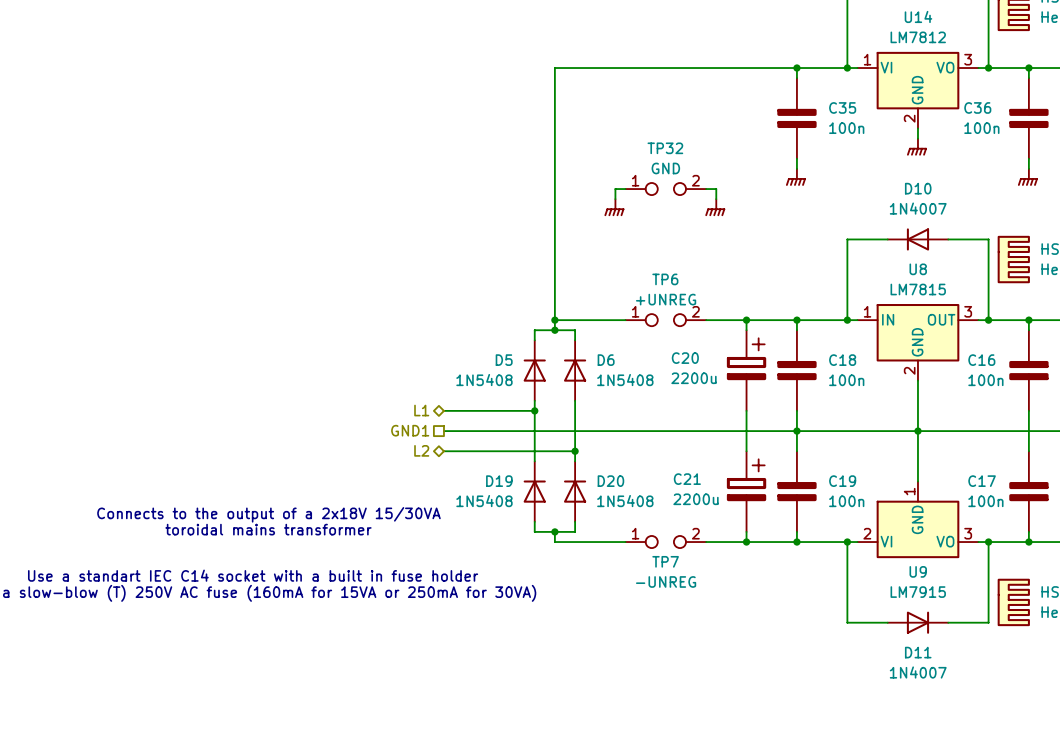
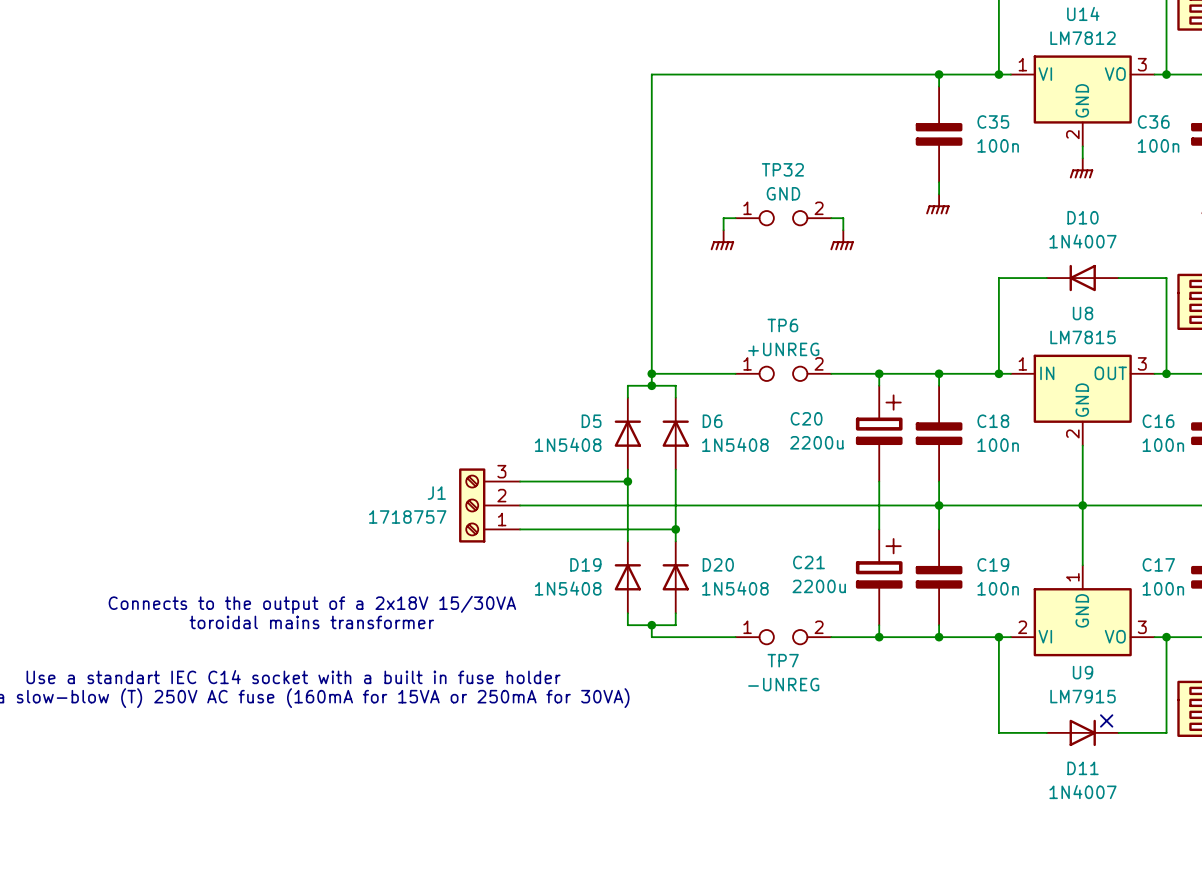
hierarchical label: L1 (421, 410) -> none
hierarchical label: GND1 (410, 430) -> none
J1: none -> 1718757 (489, 505)
hierarchical label: L2 (421, 450) -> none
no-connect mark: none -> (1106, 720)

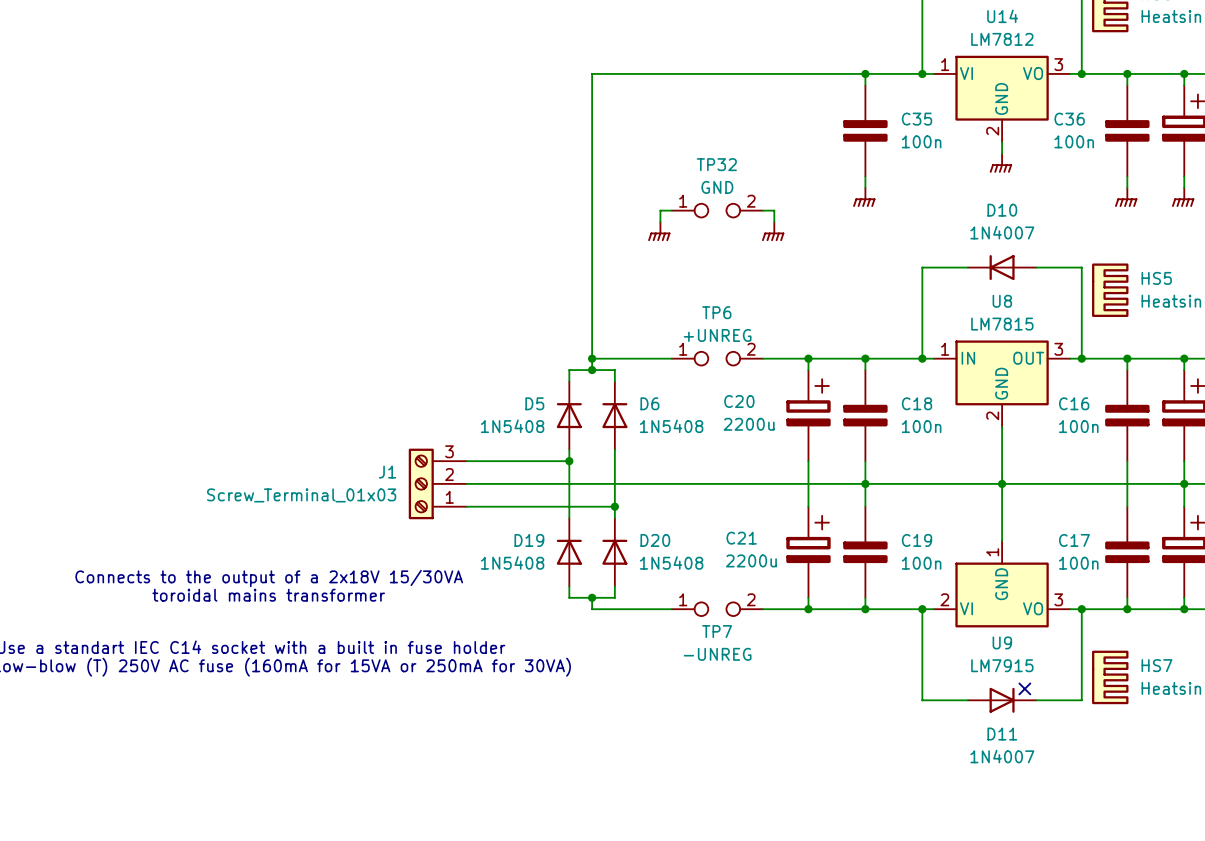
J1 value: 1718757 (407, 517) -> Screw_Terminal_01x03 (301, 495)

